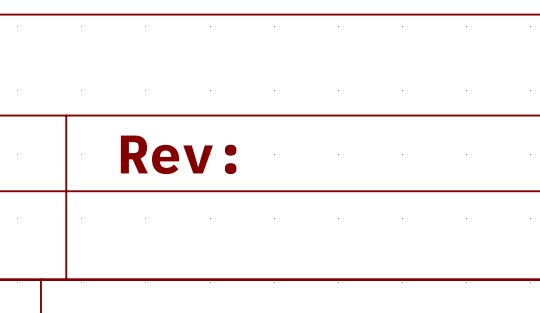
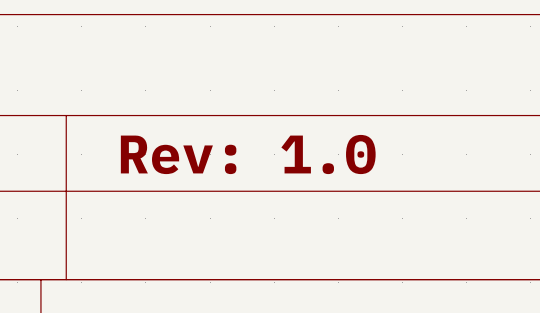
title block: Rev: (178, 154) -> Rev: 1.0 (248, 154)

